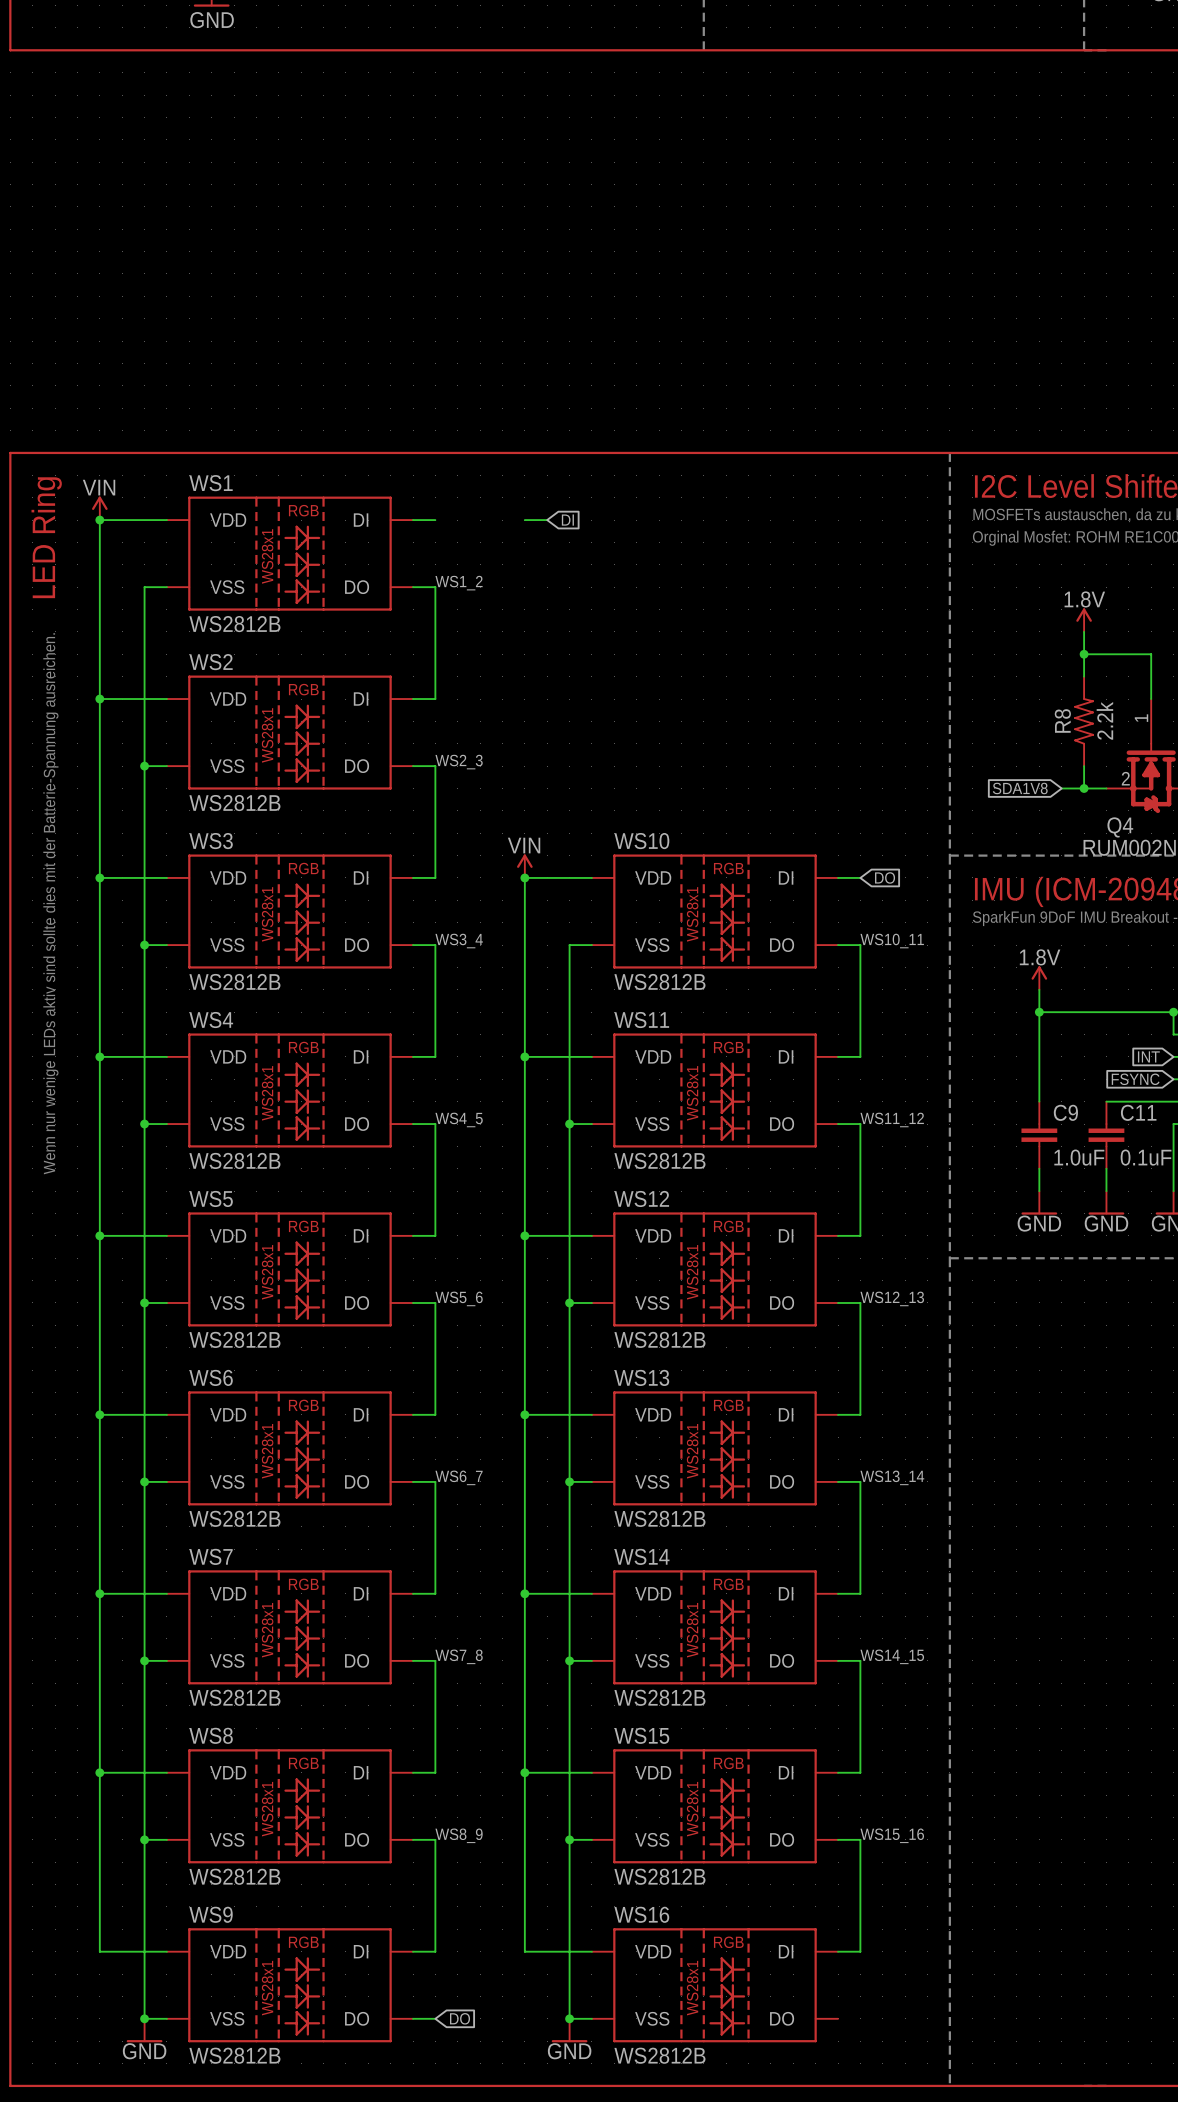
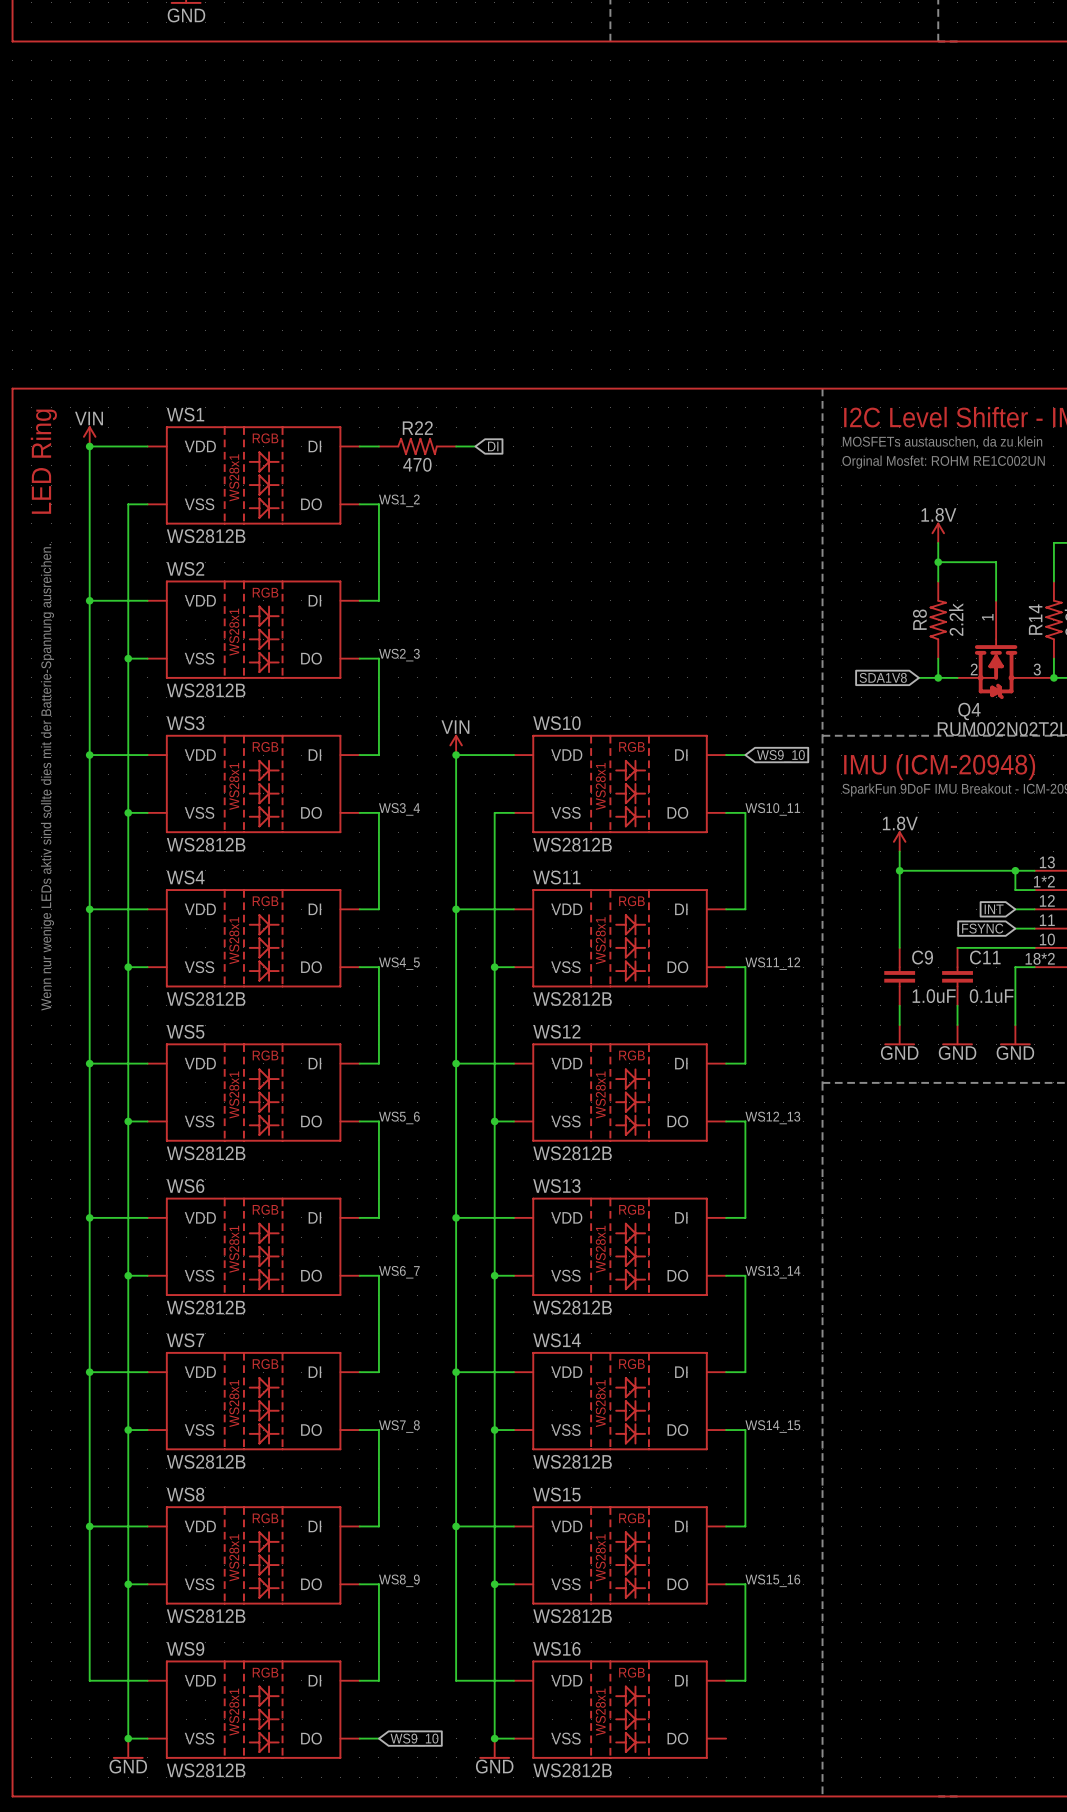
R22: none -> 470 (417, 446)
global label: DO (885, 877) -> WS9_10 (780, 756)
global label: DO (460, 2018) -> WS9_10 (414, 1739)

